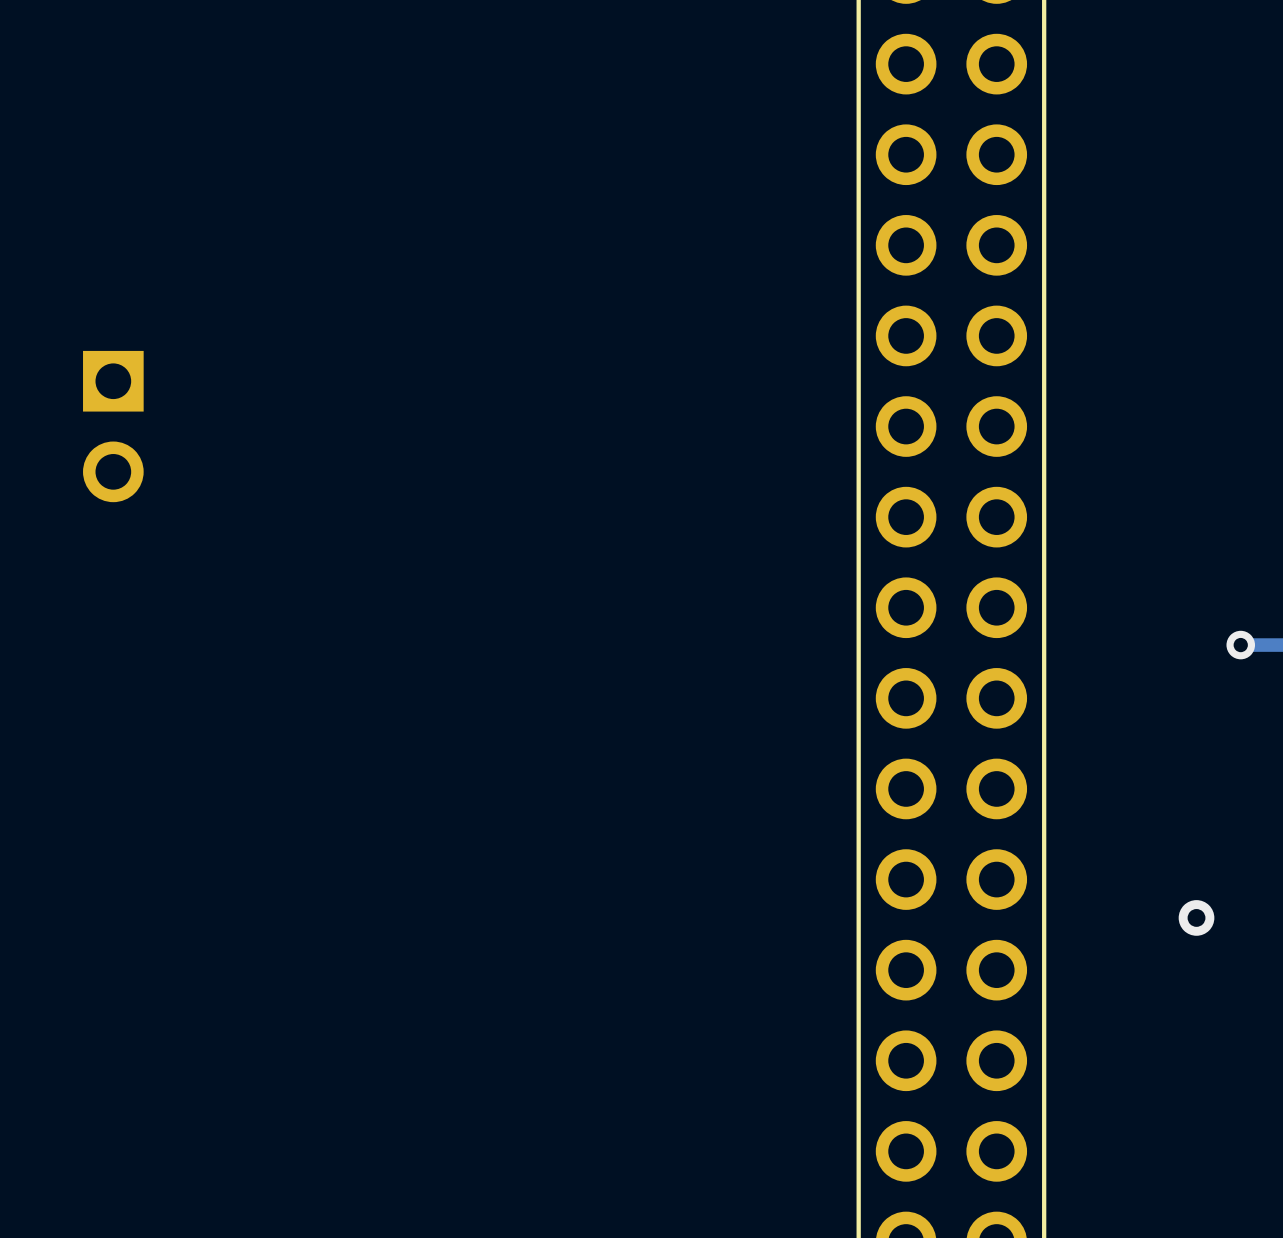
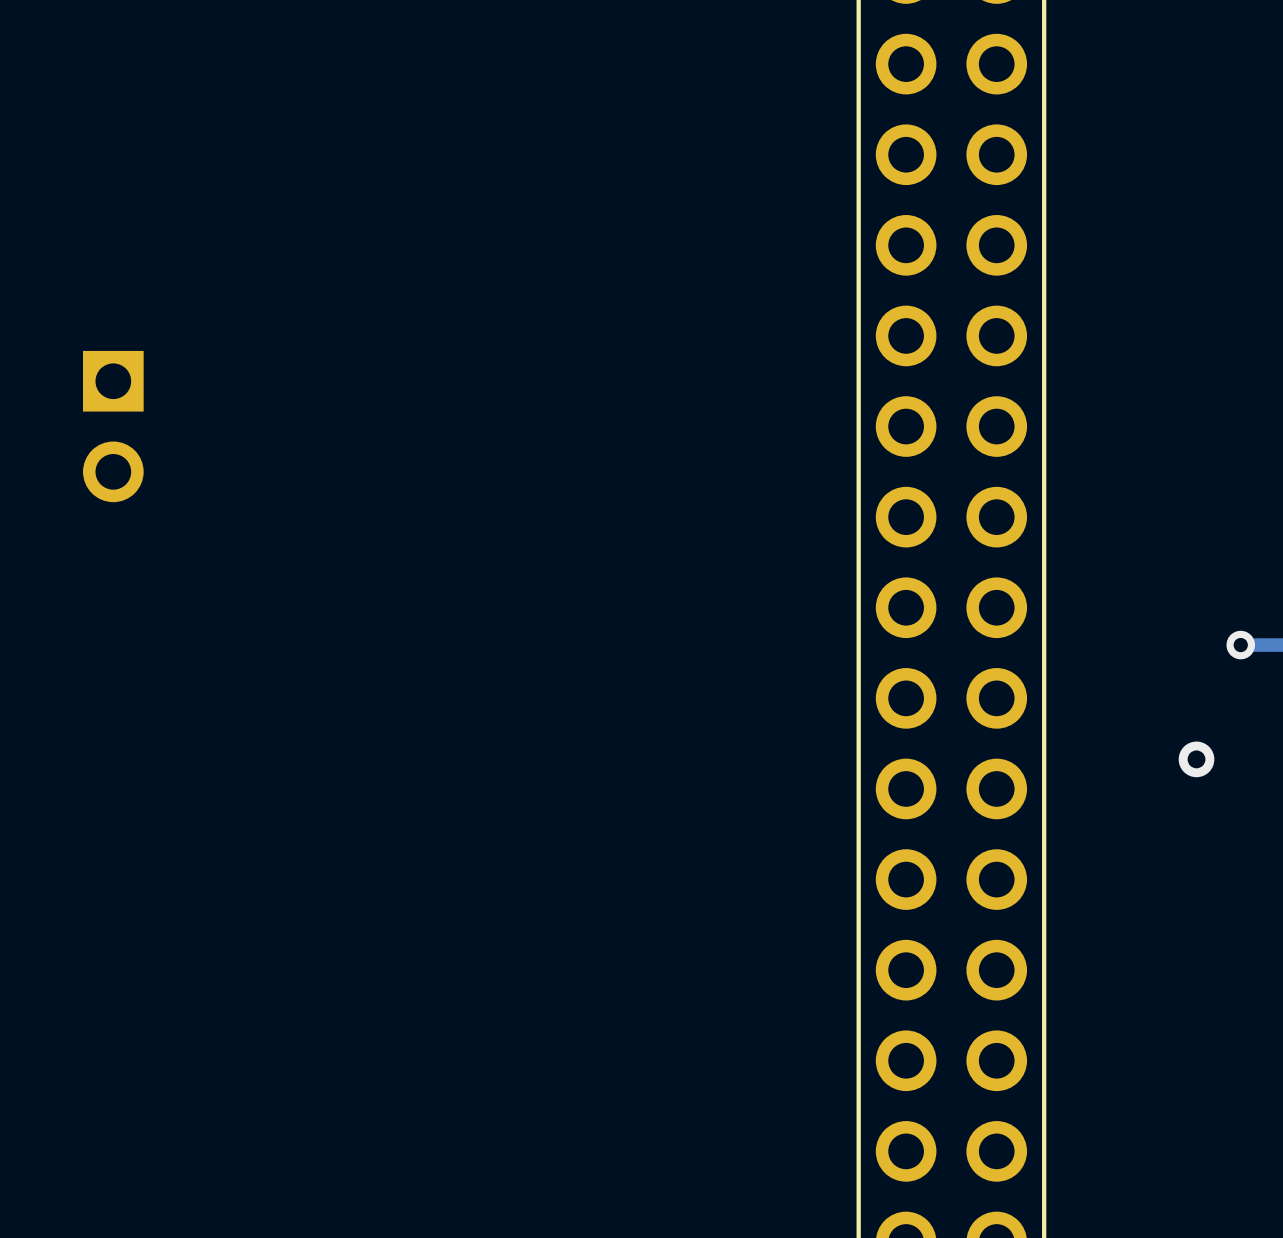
via position: (1196, 917) -> (1196, 759)

